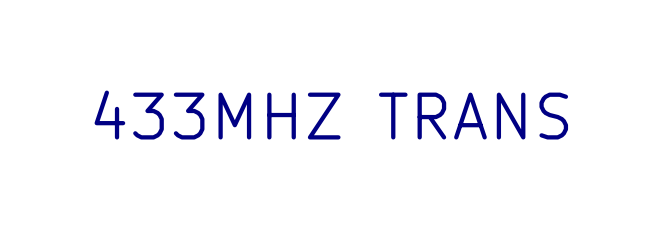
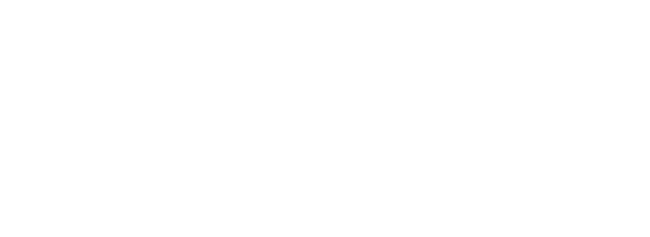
text: 433MHZ TRANS (331, 115) -> none

